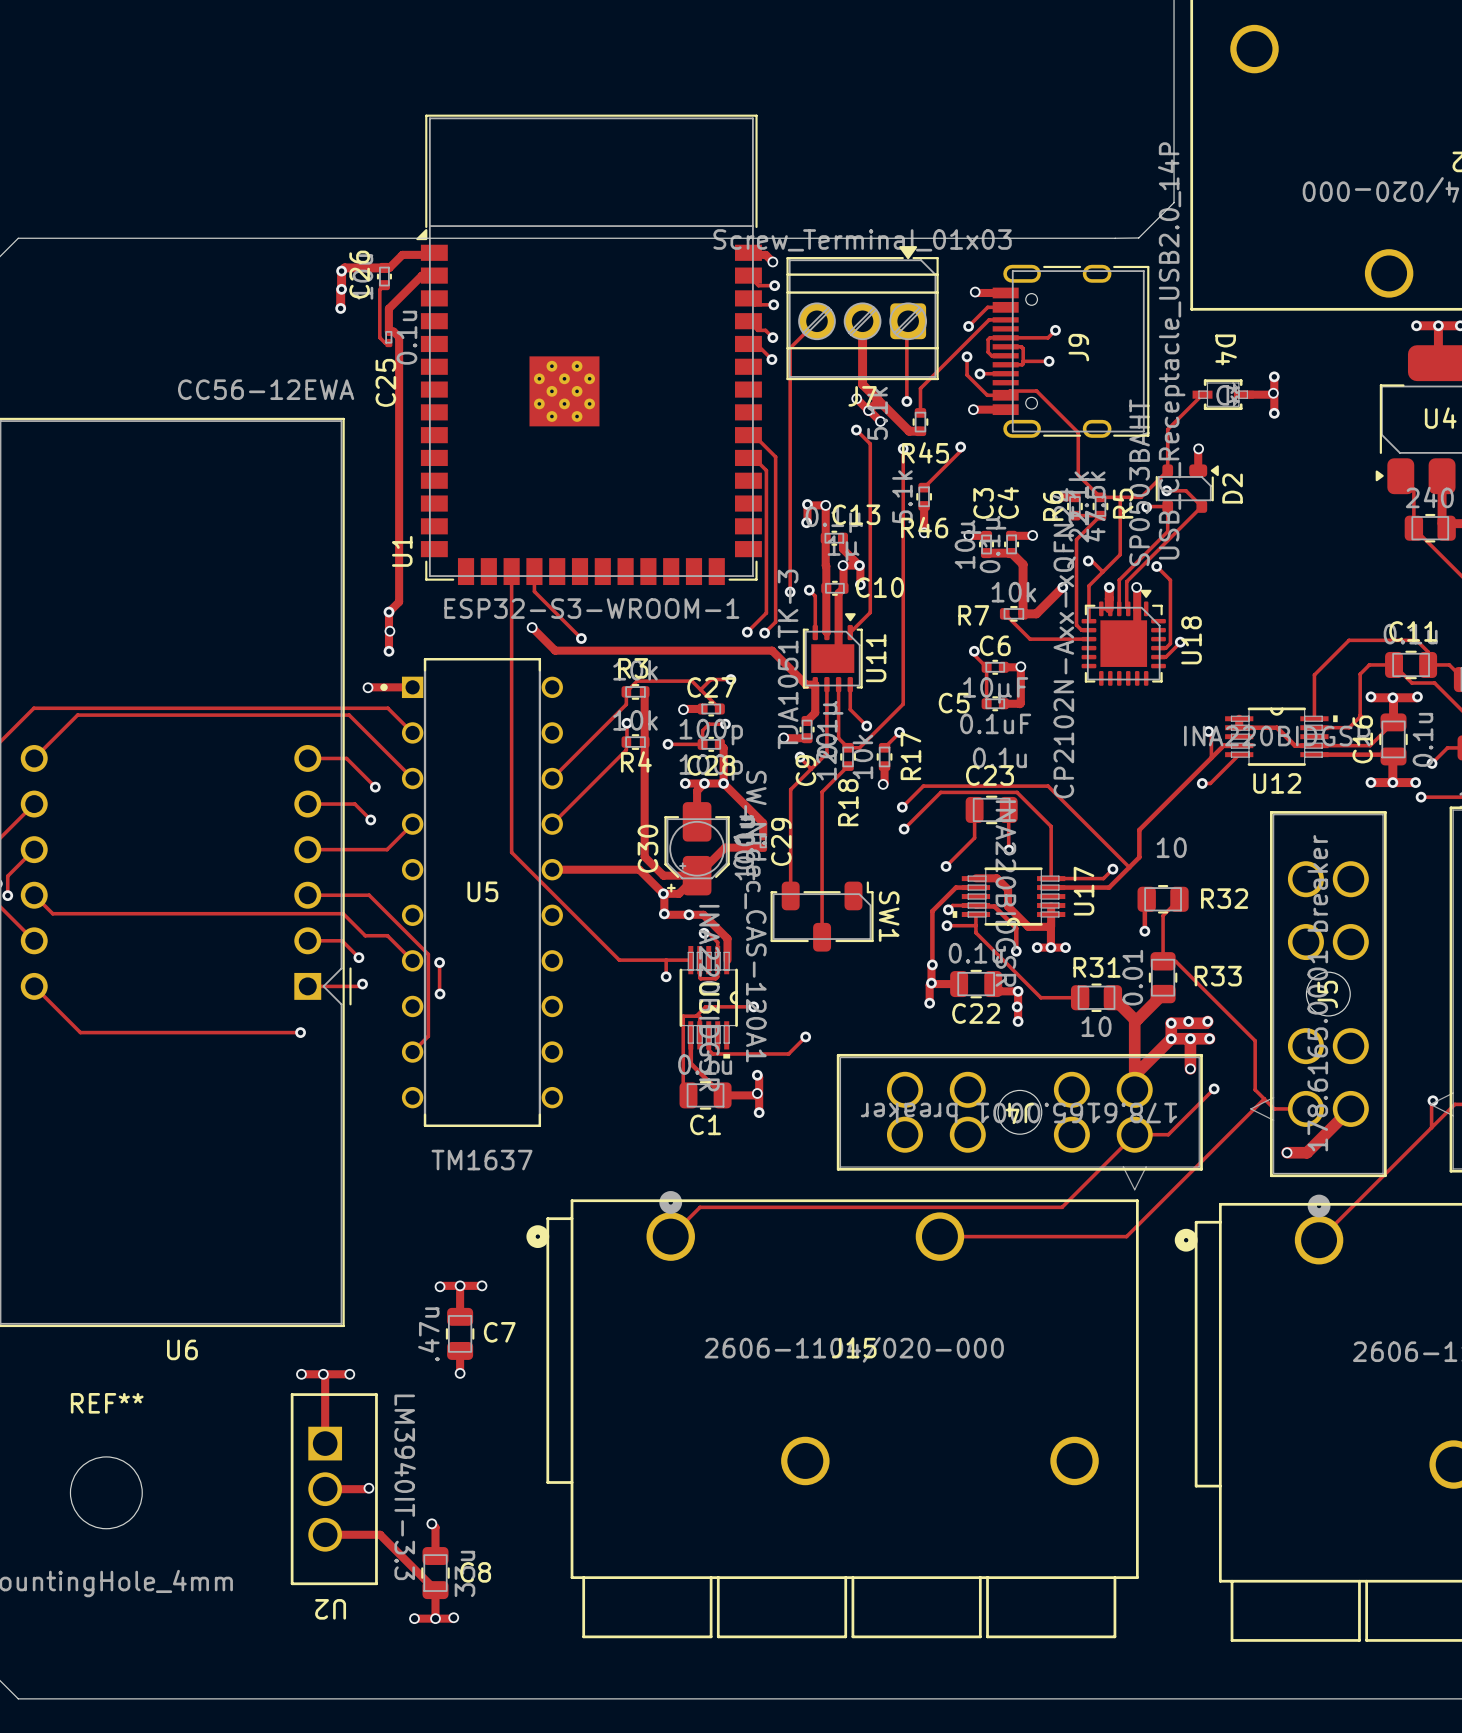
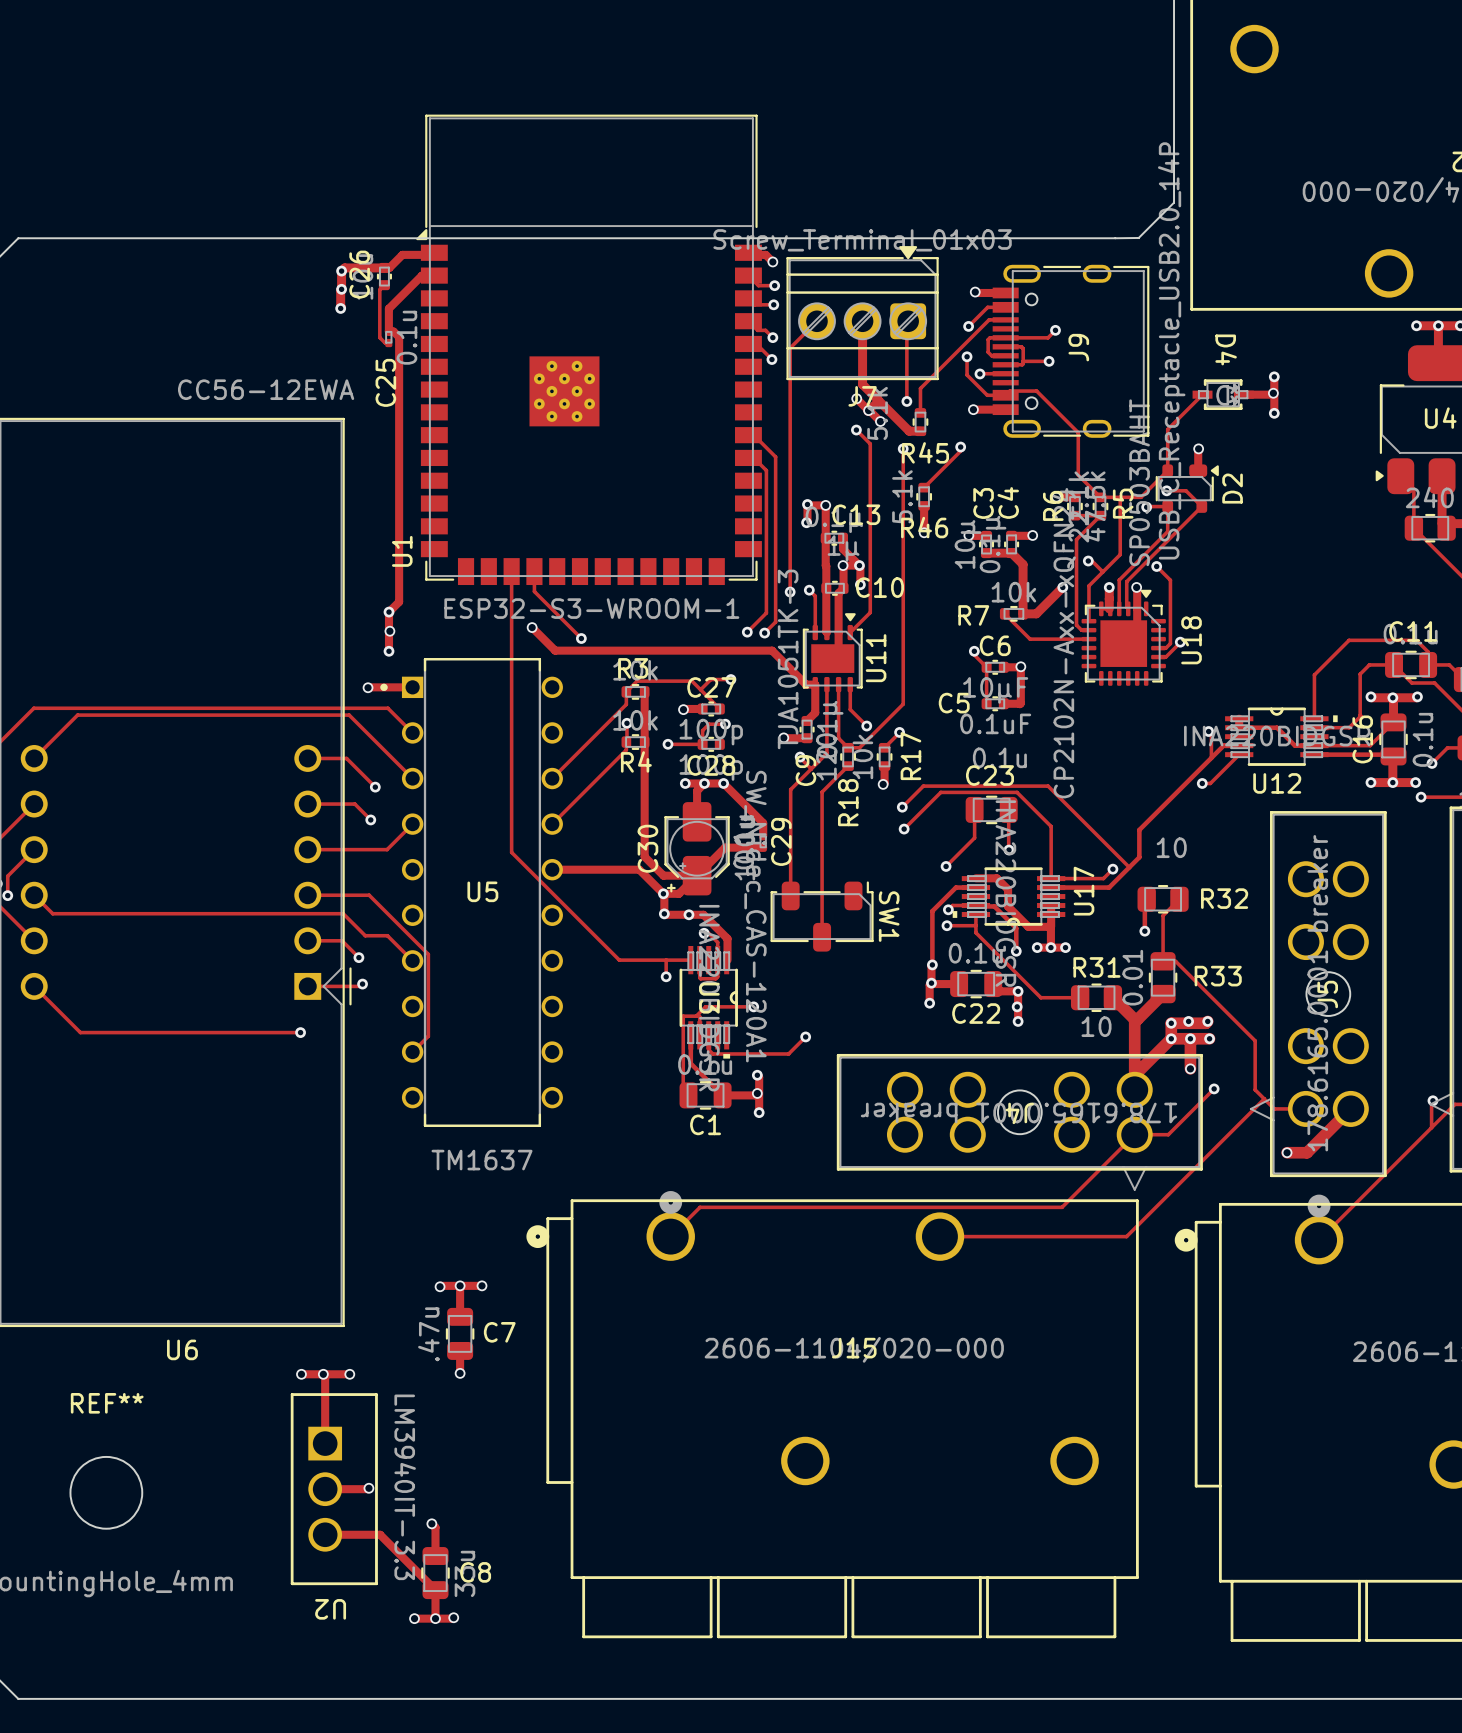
track: (719, 744) (723, 748) (723, 783) -> none
track: (439, 962) (440, 993) -> none
via: (439, 962) -> none
via: (440, 993) -> none

